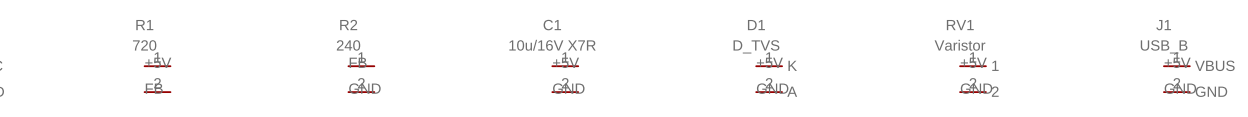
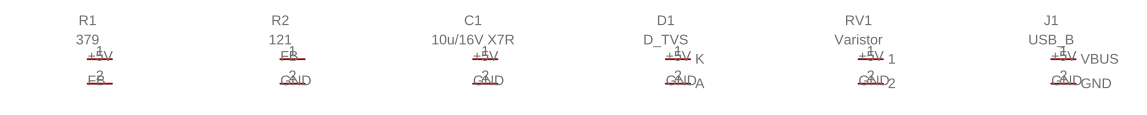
R1 value: 720 (144, 45) -> 379 (87, 39)
R2 value: 240 (348, 45) -> 121 (280, 39)

